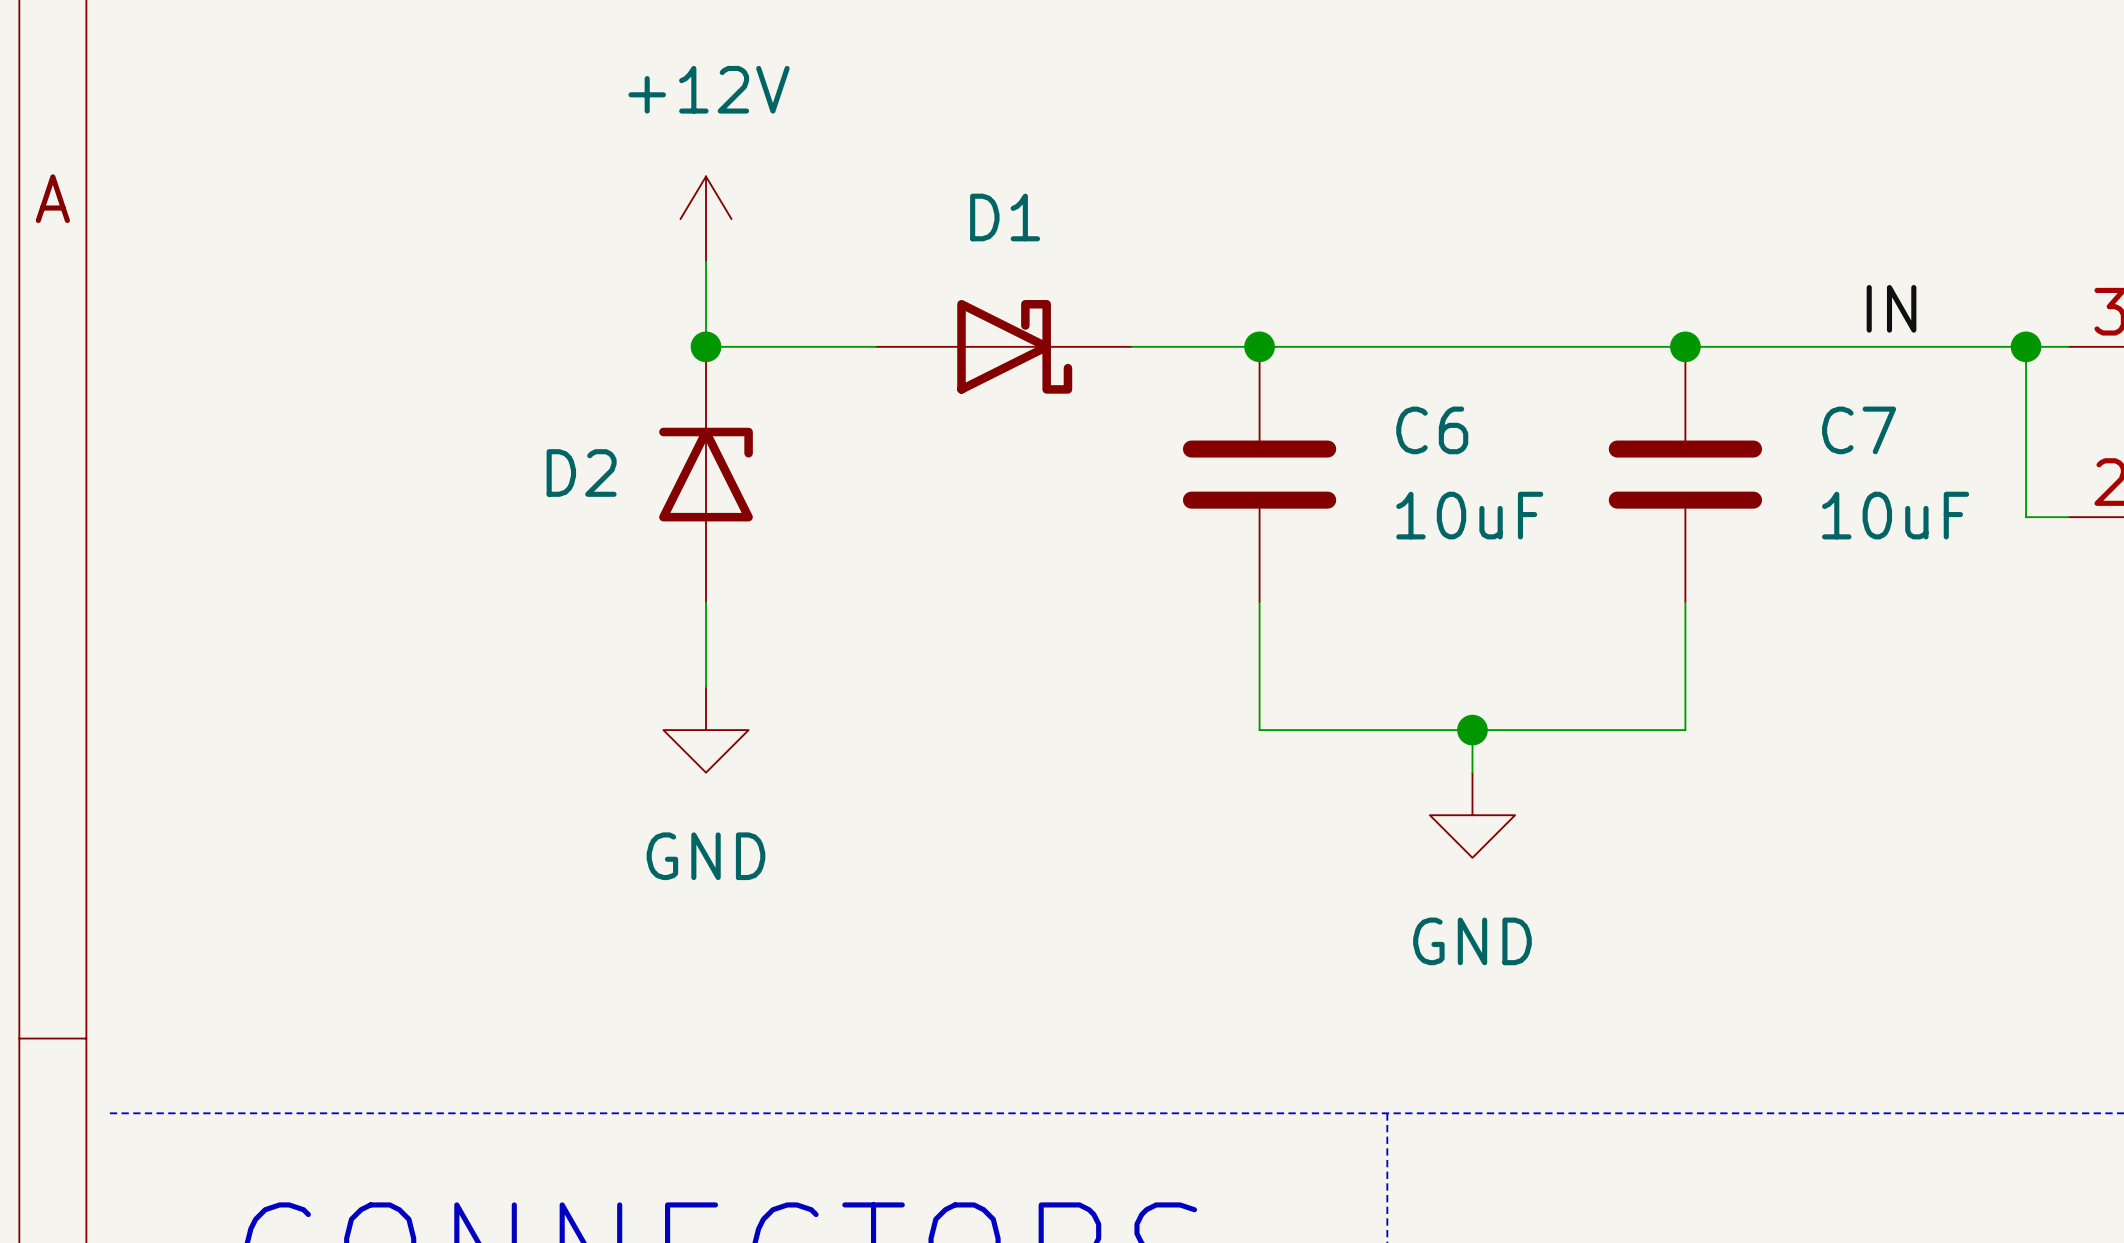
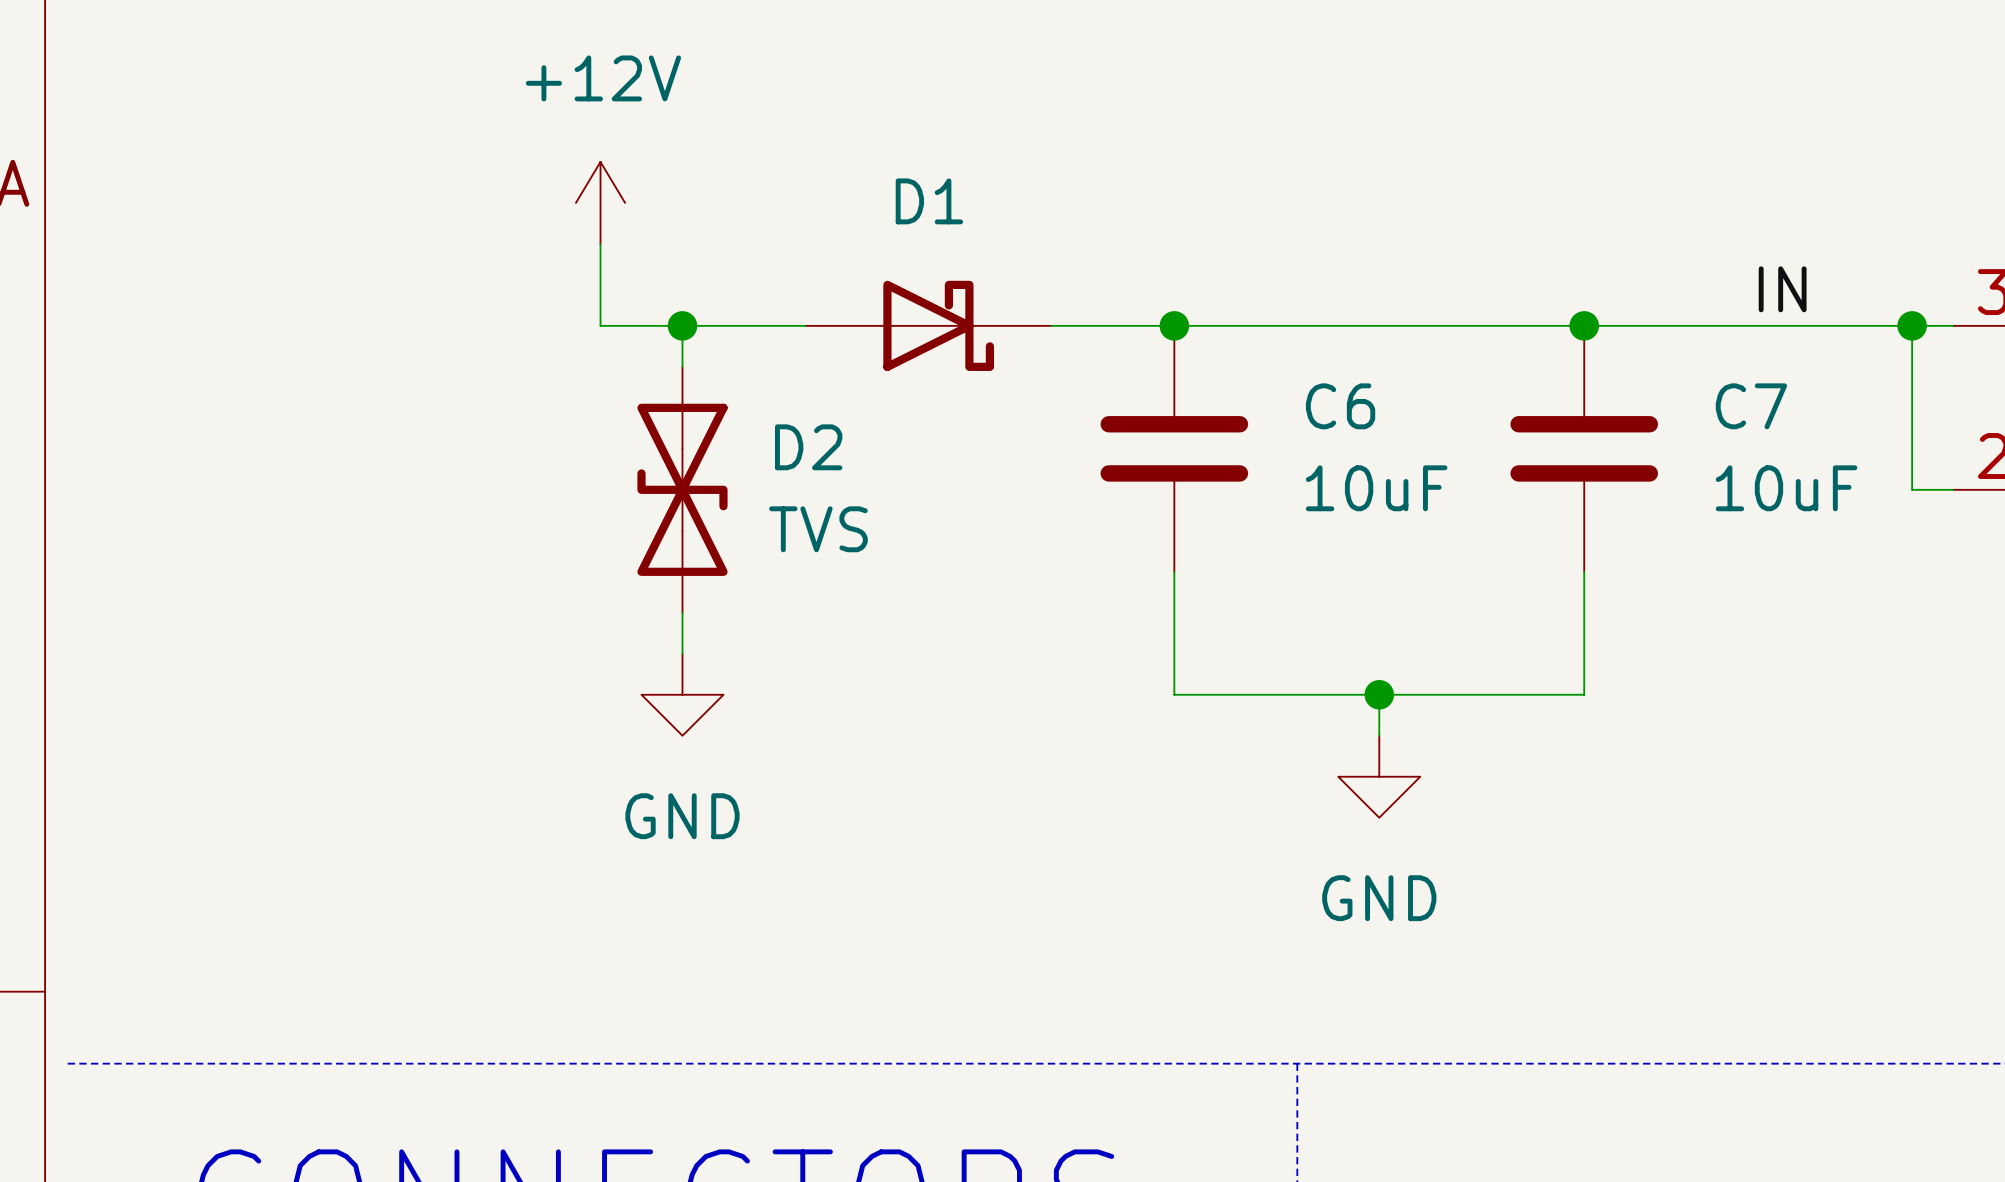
power symbol position: +12V (706, 219) -> +12V (600, 202)
wire: (706, 261) (706, 346) -> (600, 243) (600, 325) (641, 325)
D2 symbol: [659, 346, 753, 603] -> [637, 366, 728, 613]
junction position: (706, 346) -> (682, 325)
wire: none -> (682, 325) (682, 366)
D2 name position: D2 (581, 472) -> D2 (808, 447)
D2 value: none -> TVS (818, 529)
wire: (706, 602) (706, 687) -> none
wire: none -> (682, 612) (682, 653)
power symbol position: GND (706, 730) -> GND (682, 694)

